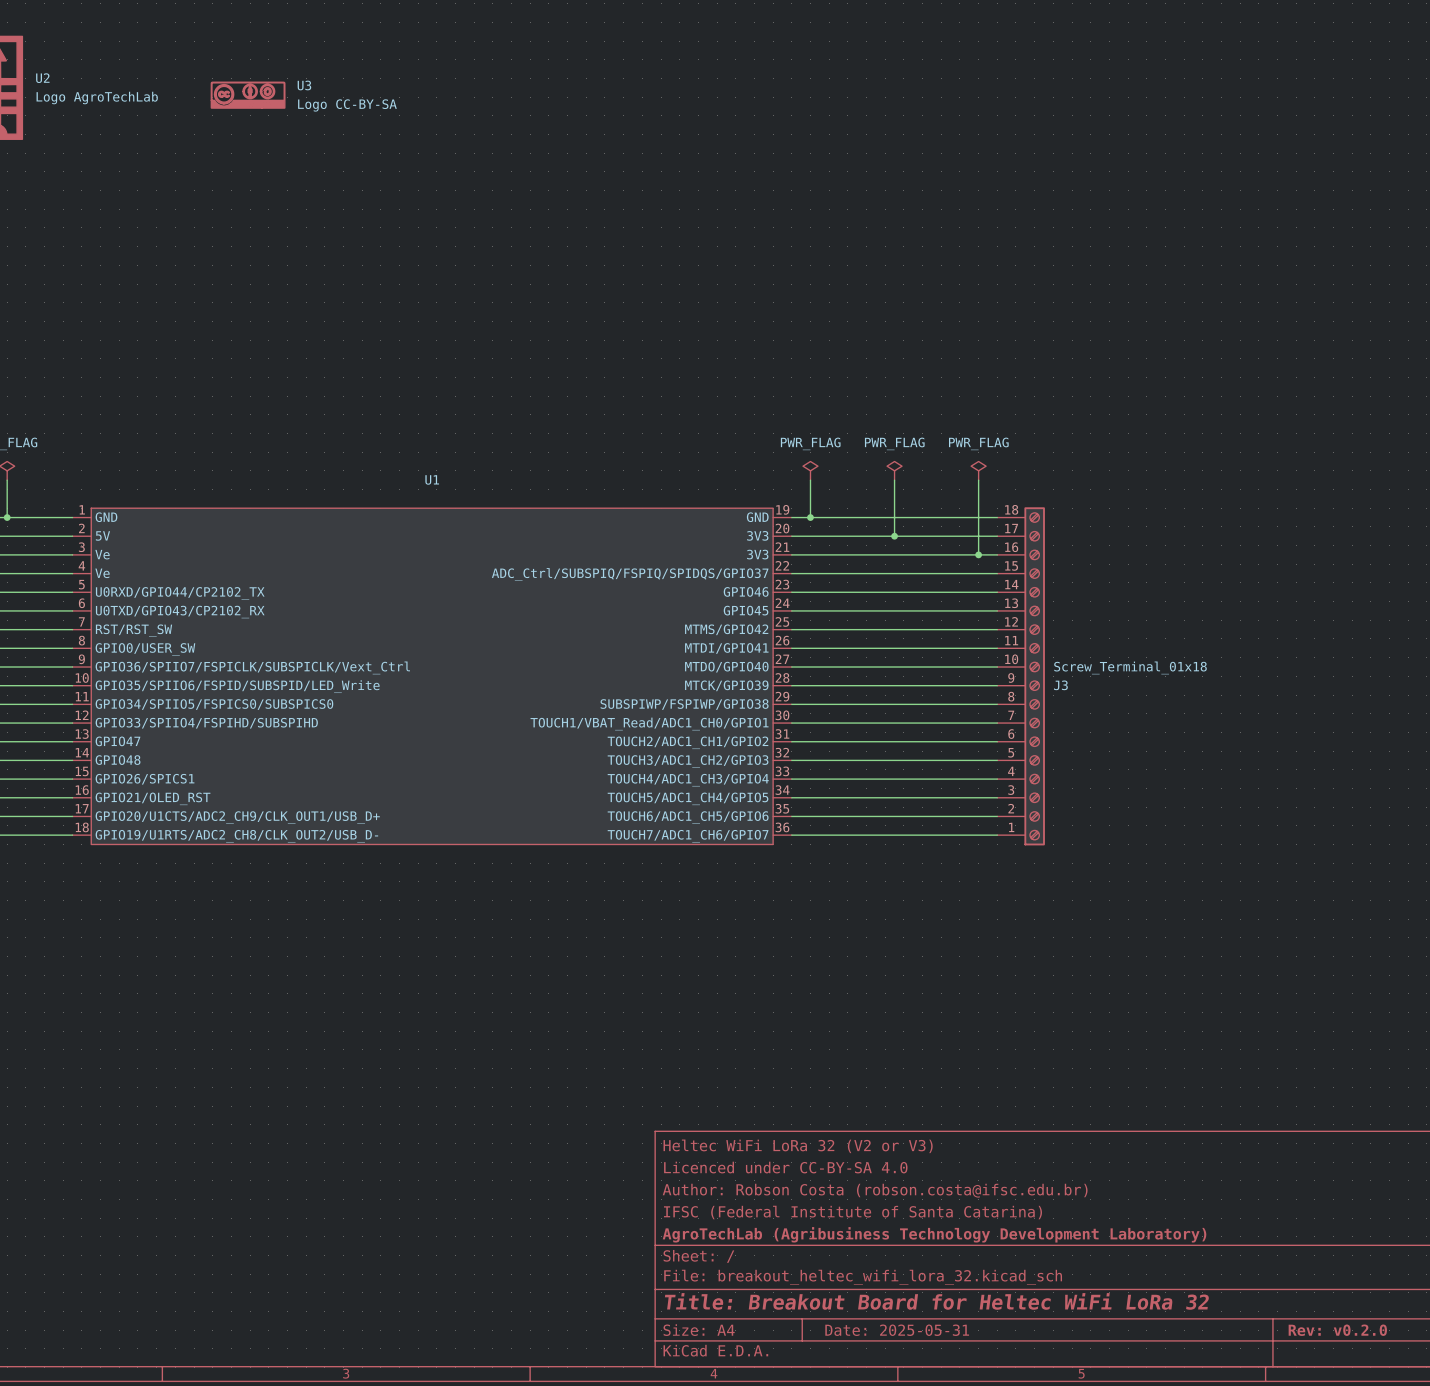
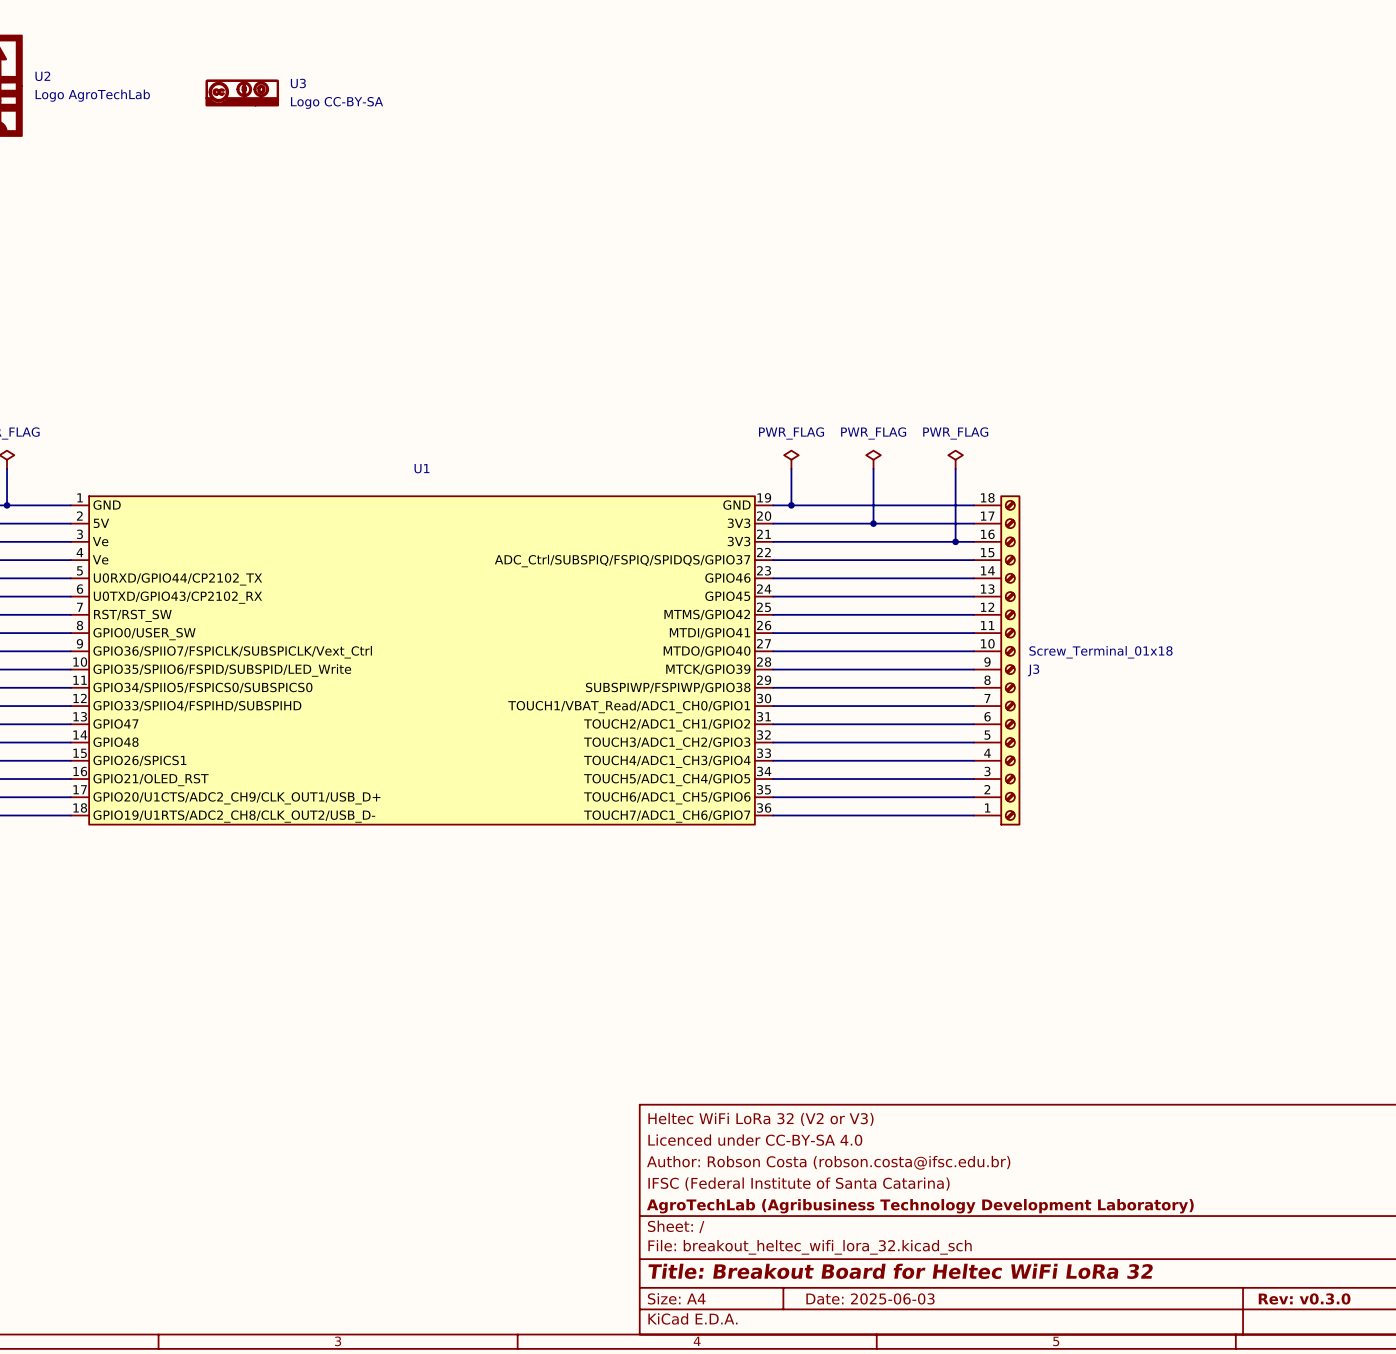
title block: Date: 2025-05-31 (897, 1330) -> Date: 2025-06-03 (870, 1298)
title block: Rev: v0.2.0 (1337, 1330) -> Rev: v0.3.0 (1304, 1298)

